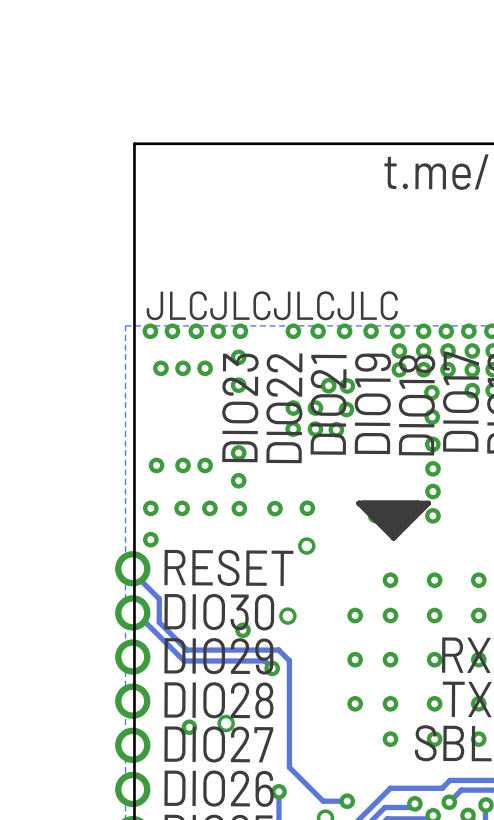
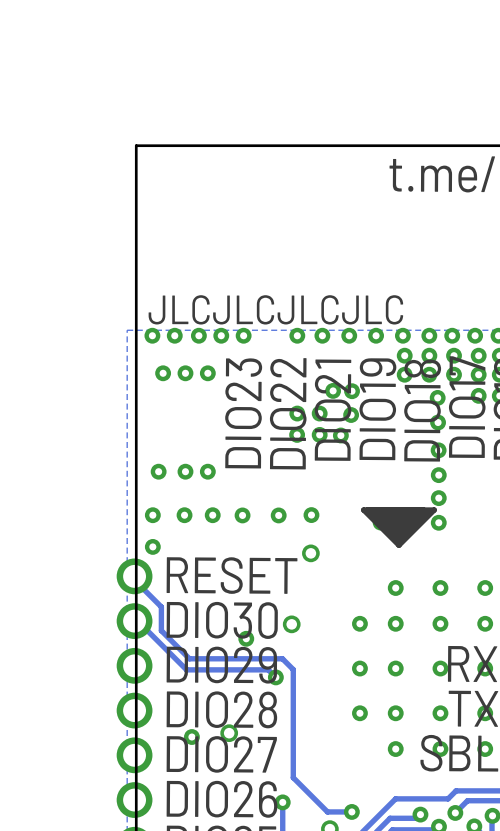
via: (238, 357) -> none
via: (238, 385) -> none
via: (238, 452) -> none
via: (238, 480) -> none

